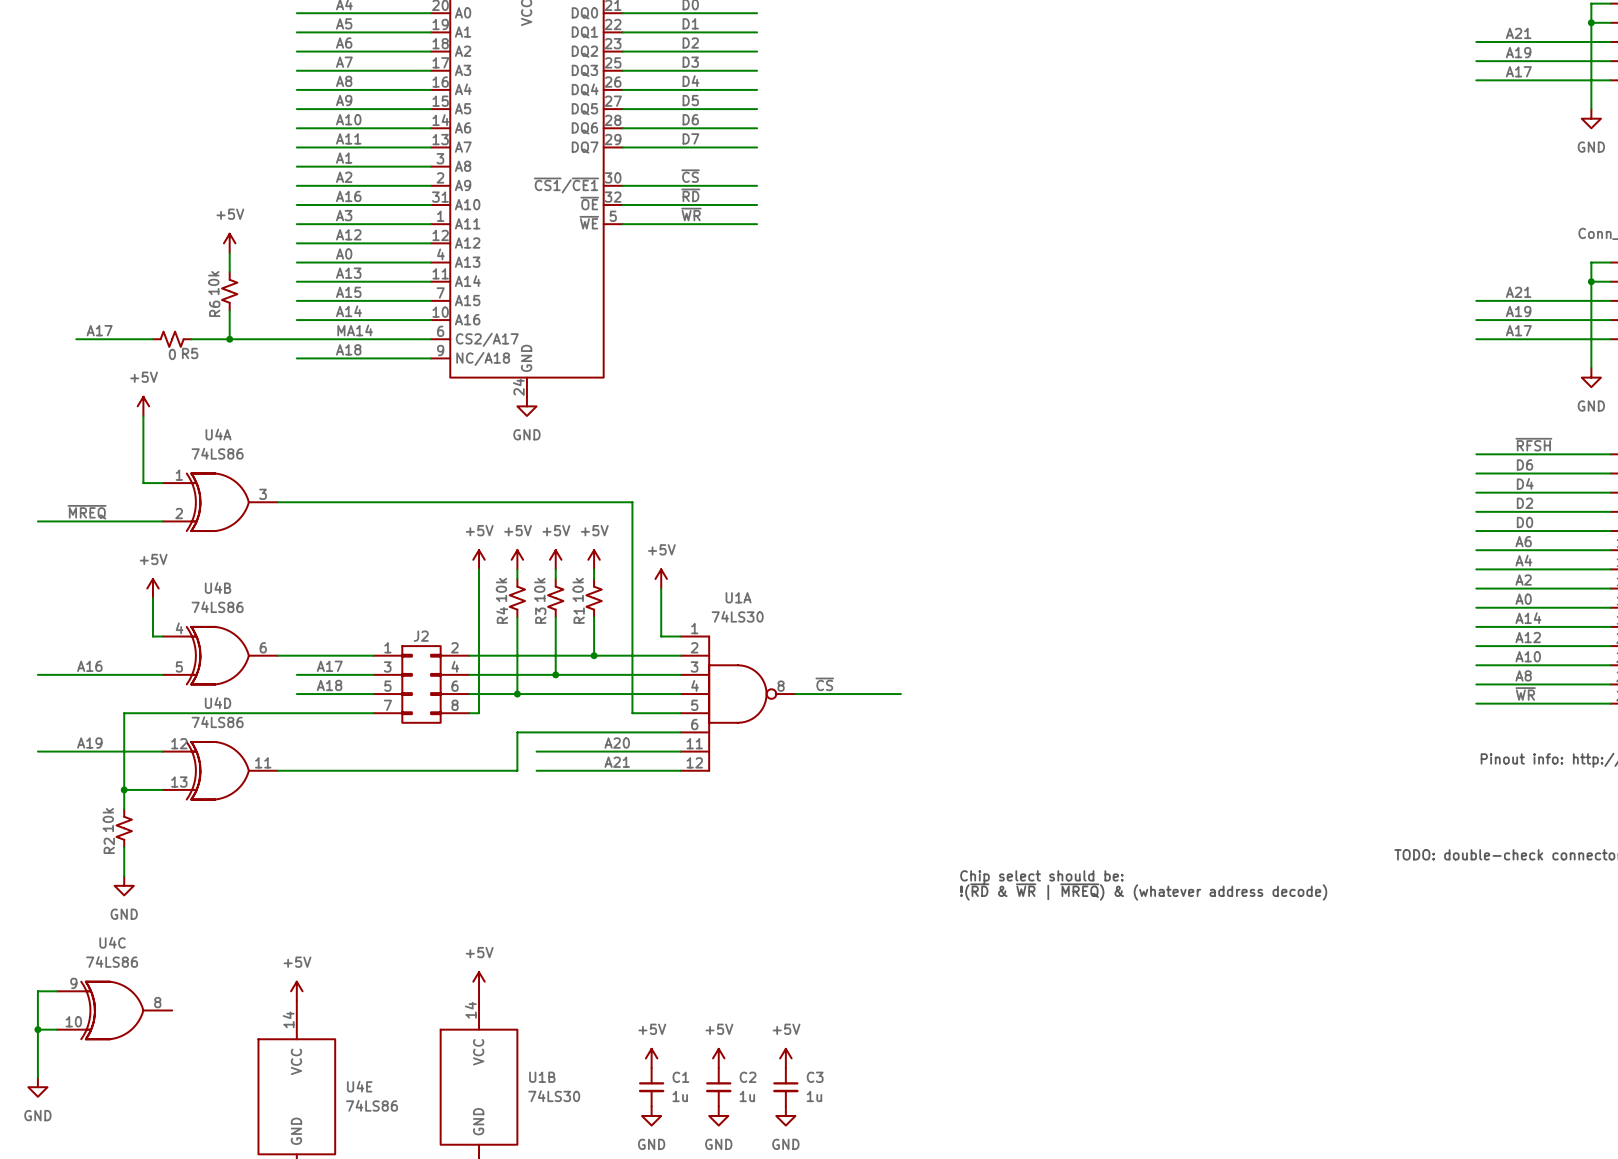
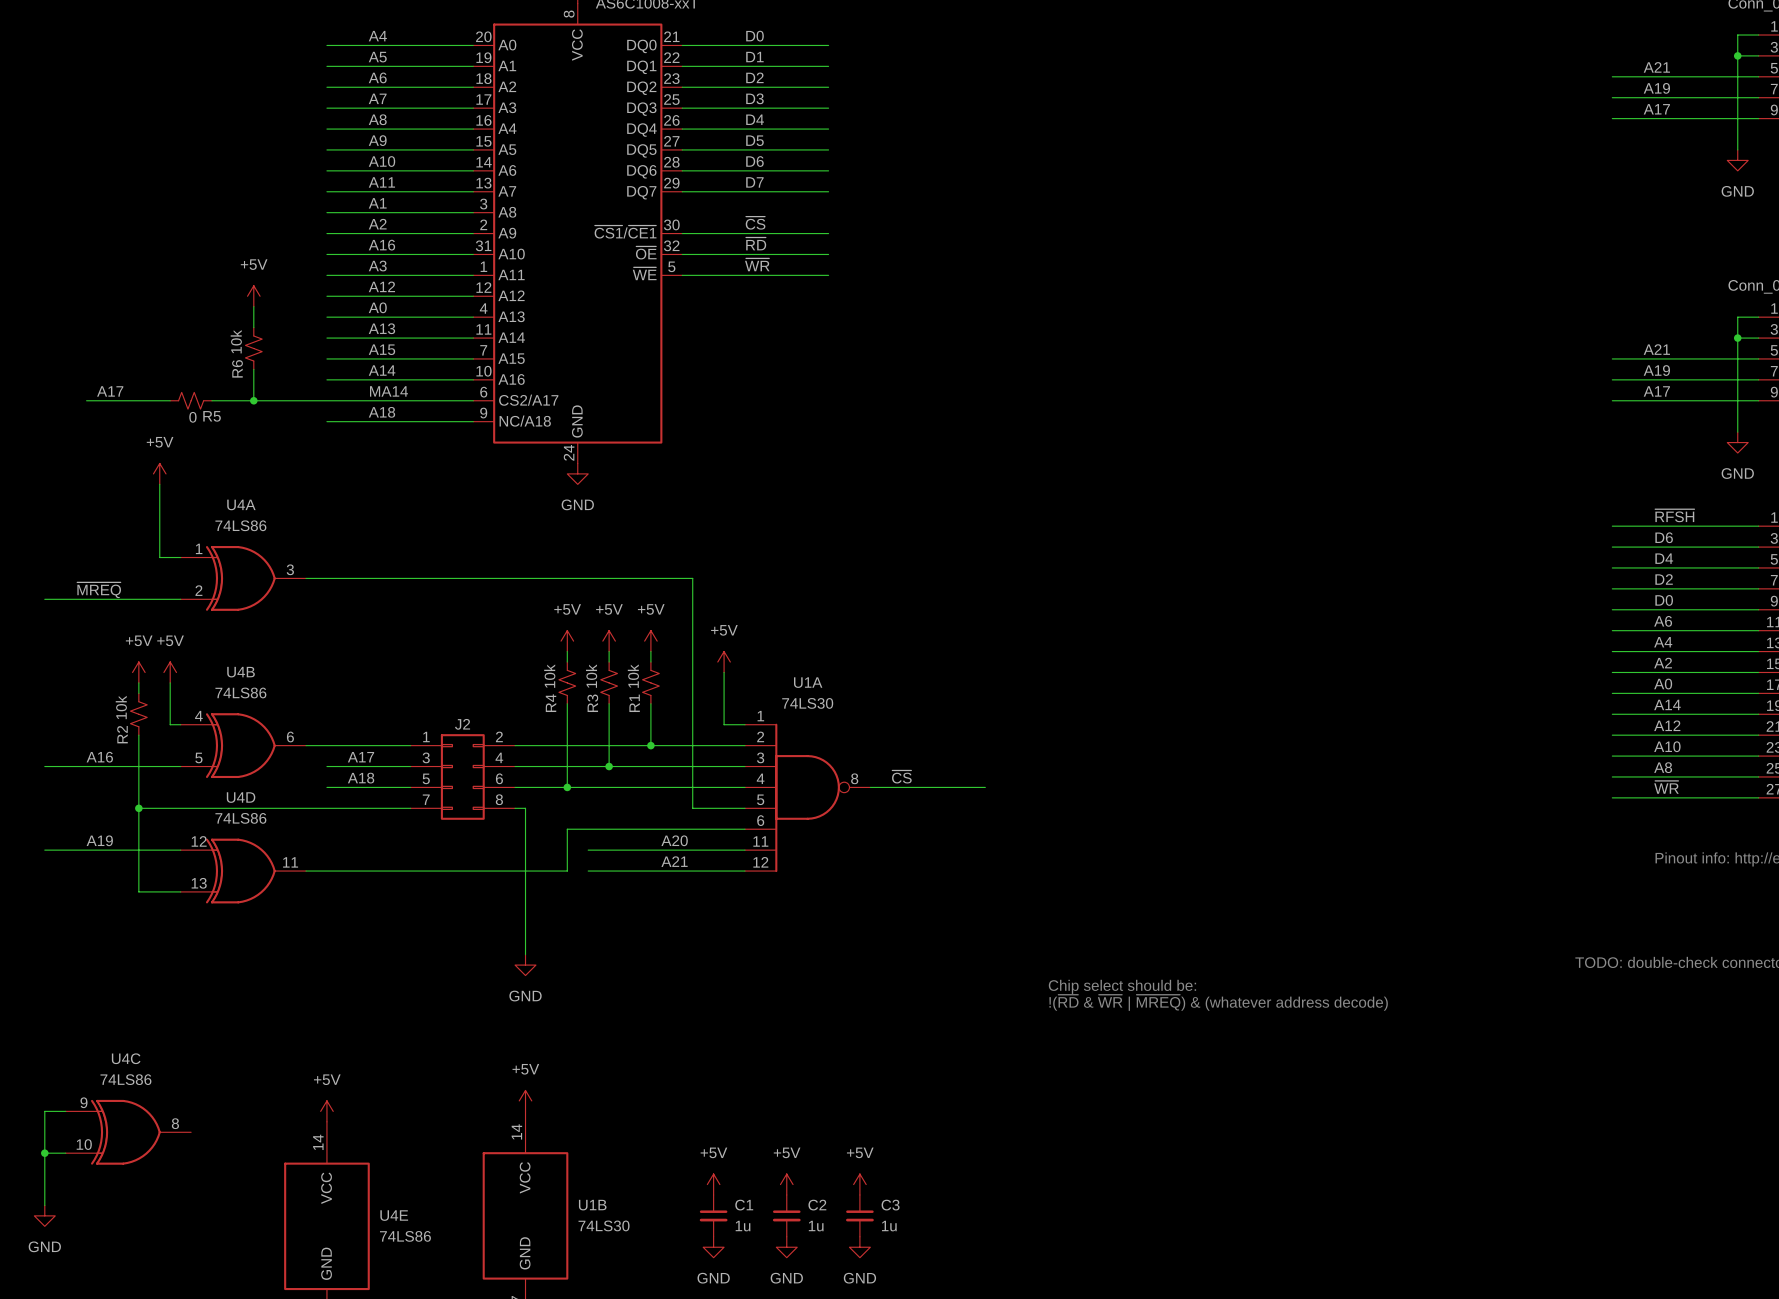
power symbol: +5V (479, 559) -> none
wire: (479, 569) (479, 713) -> (525, 954) (525, 808)
power symbol: none -> +5V (138, 672)
wire: none -> (138, 682) (138, 693)
wire: none -> (138, 735) (138, 808)
junction: none -> (138, 808)
wire: (124, 789) (124, 809) -> none
junction: (124, 789) -> none
R2 position: (124, 828) -> (138, 714)
wire: (124, 847) (124, 876) -> none
power symbol: none -> GND (525, 965)
power symbol: GND (124, 885) -> none

